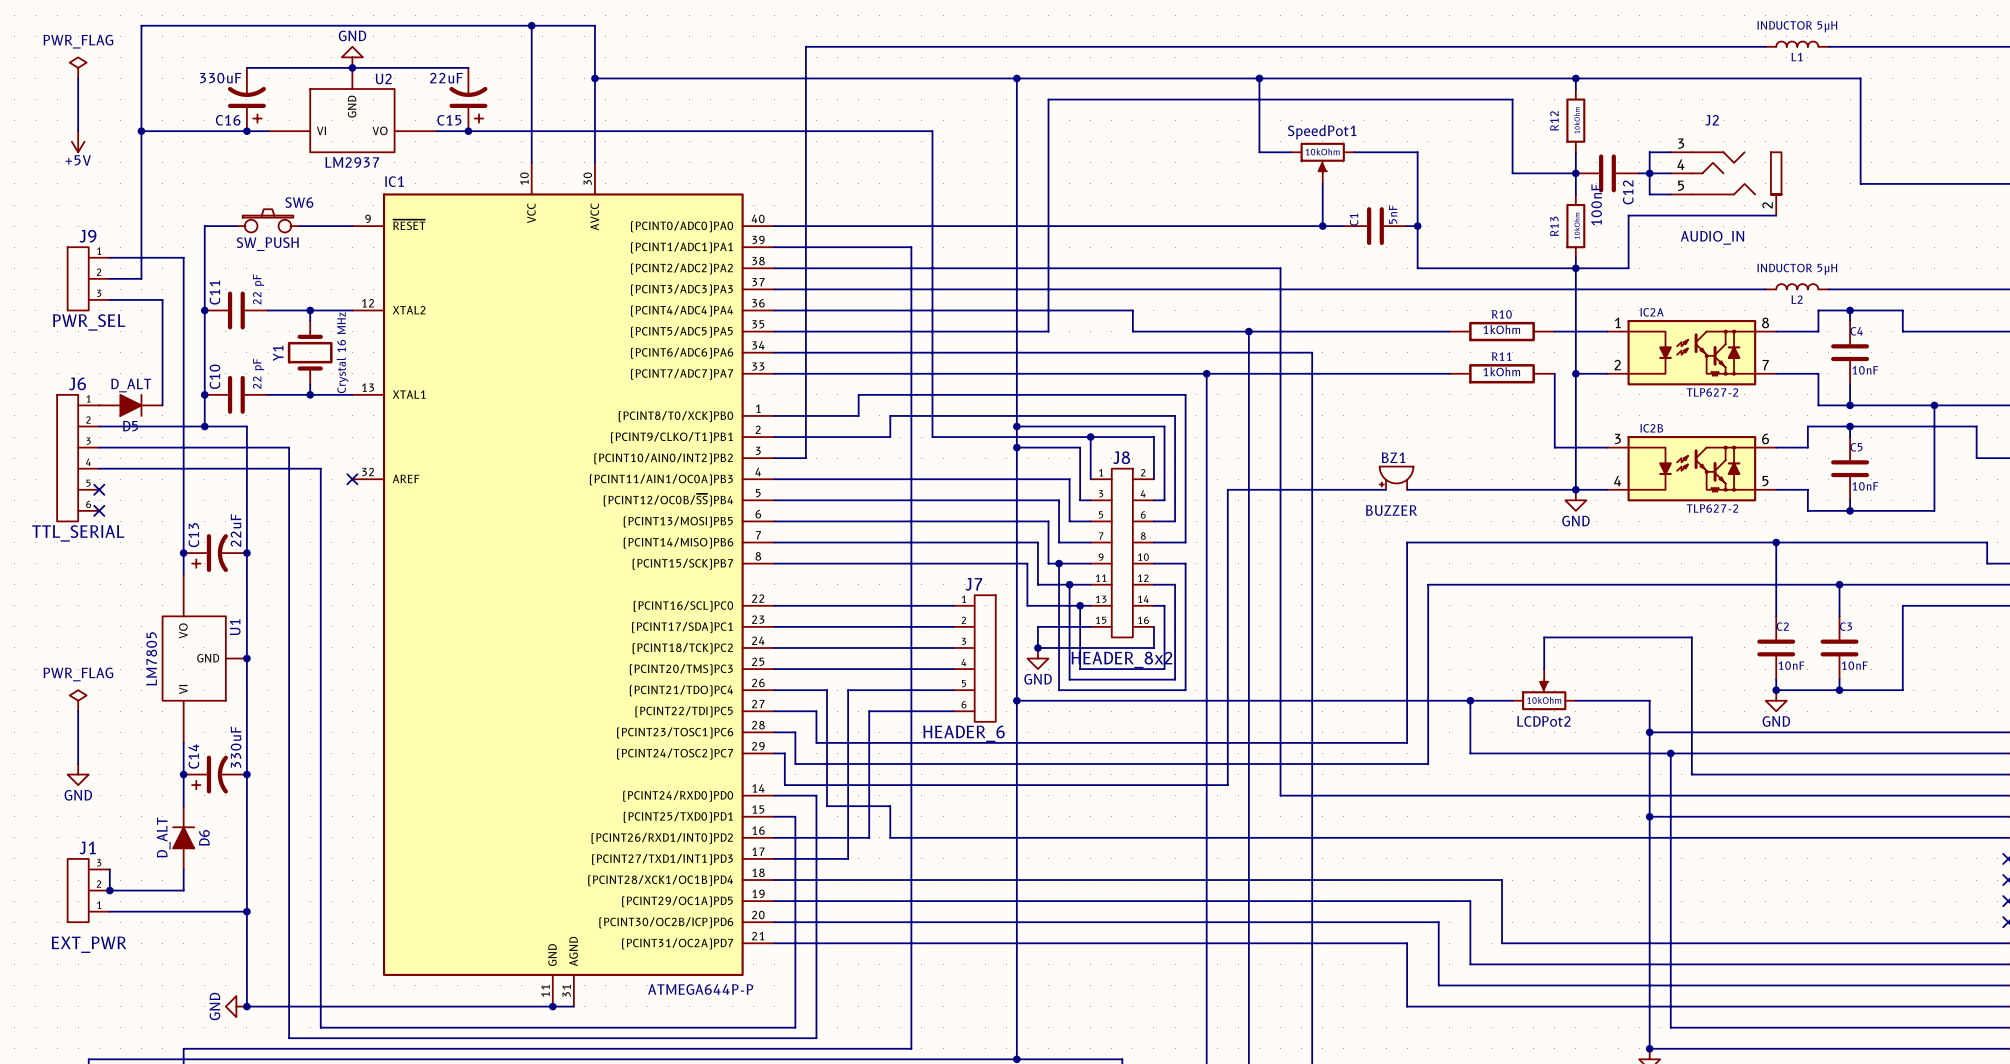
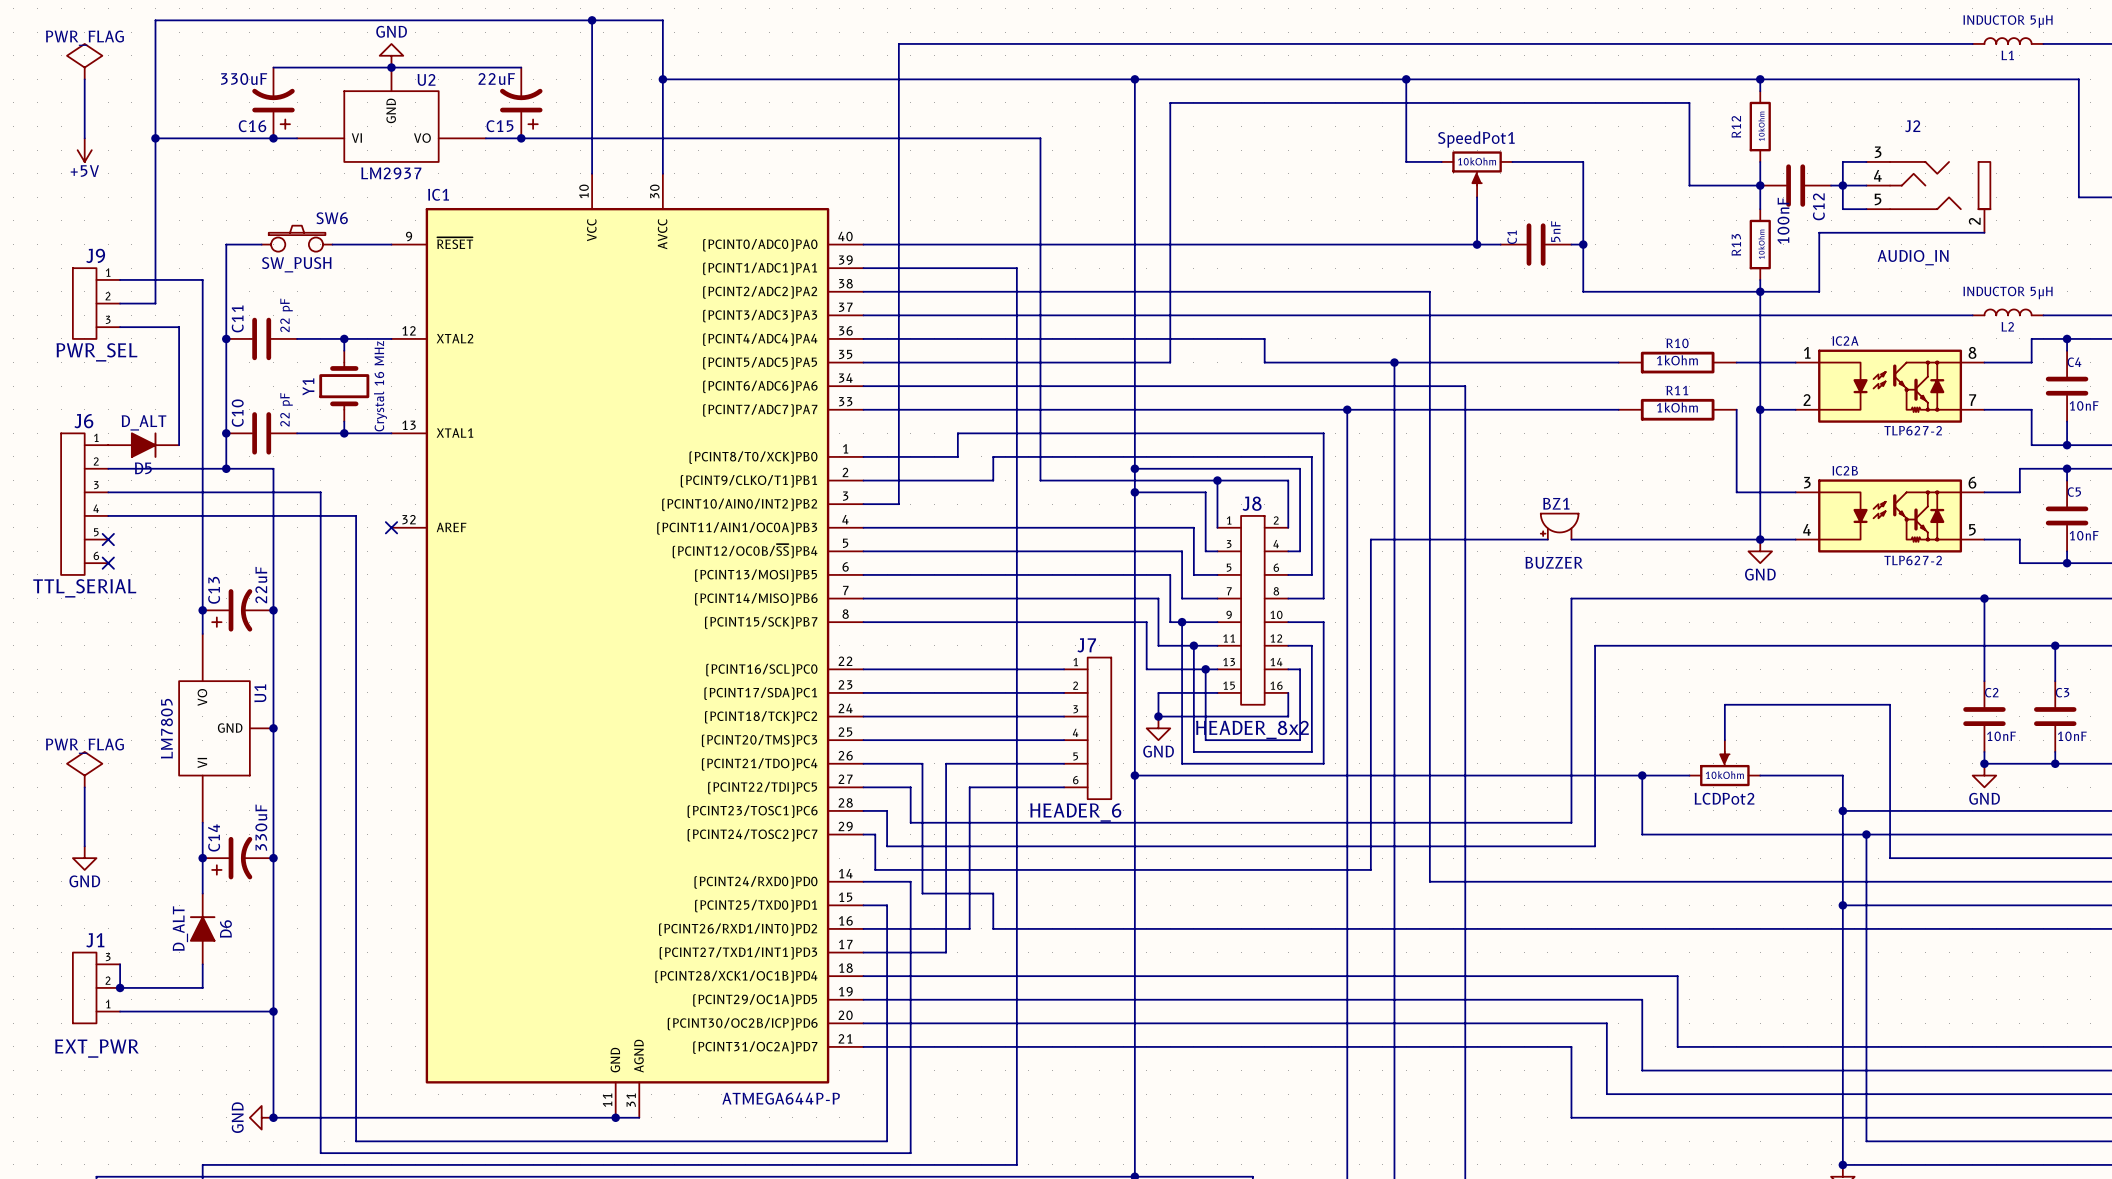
power symbol shape: [69, 57, 87, 79] -> [66, 43, 103, 80]
power symbol shape: [69, 690, 87, 712] -> [66, 751, 103, 788]

